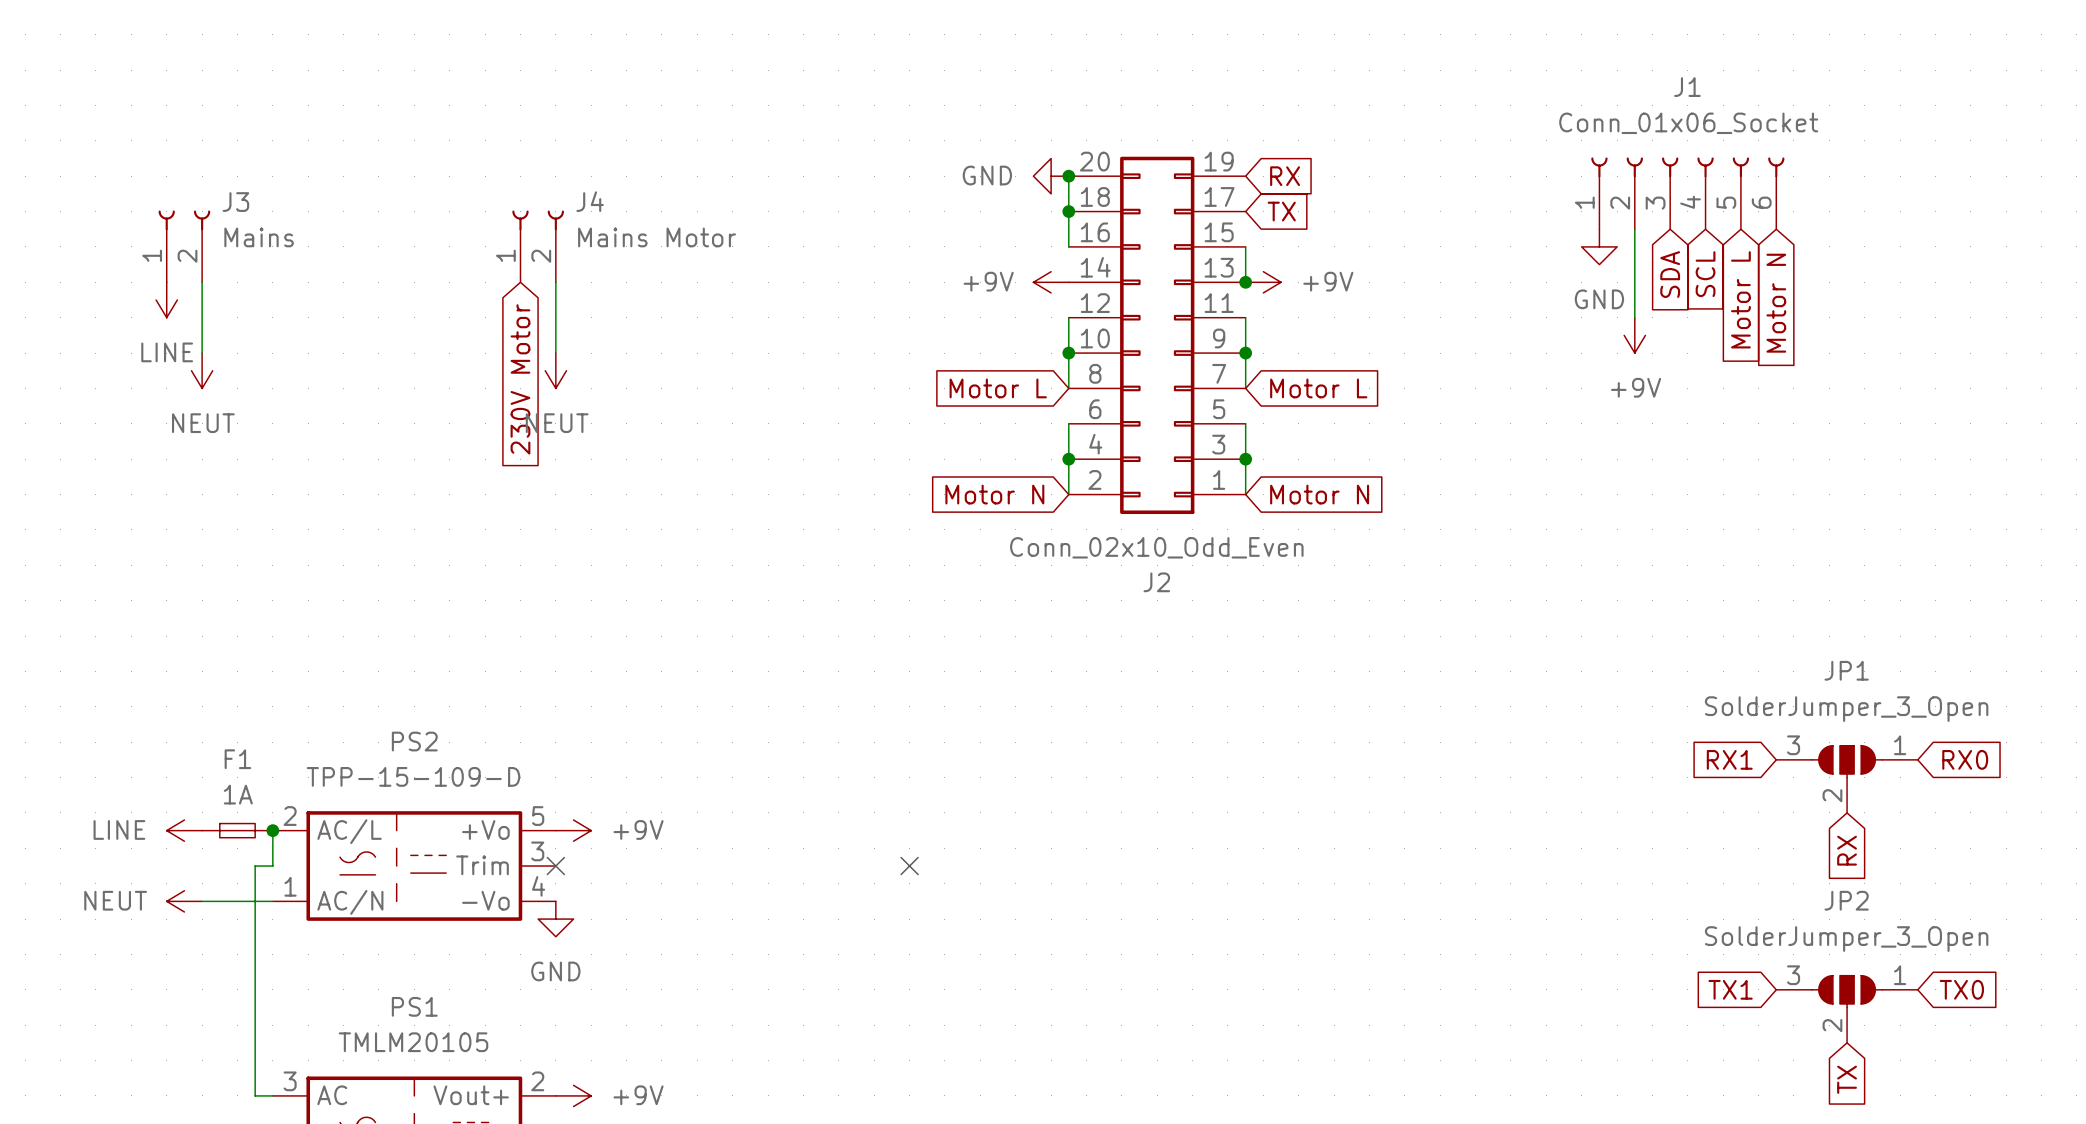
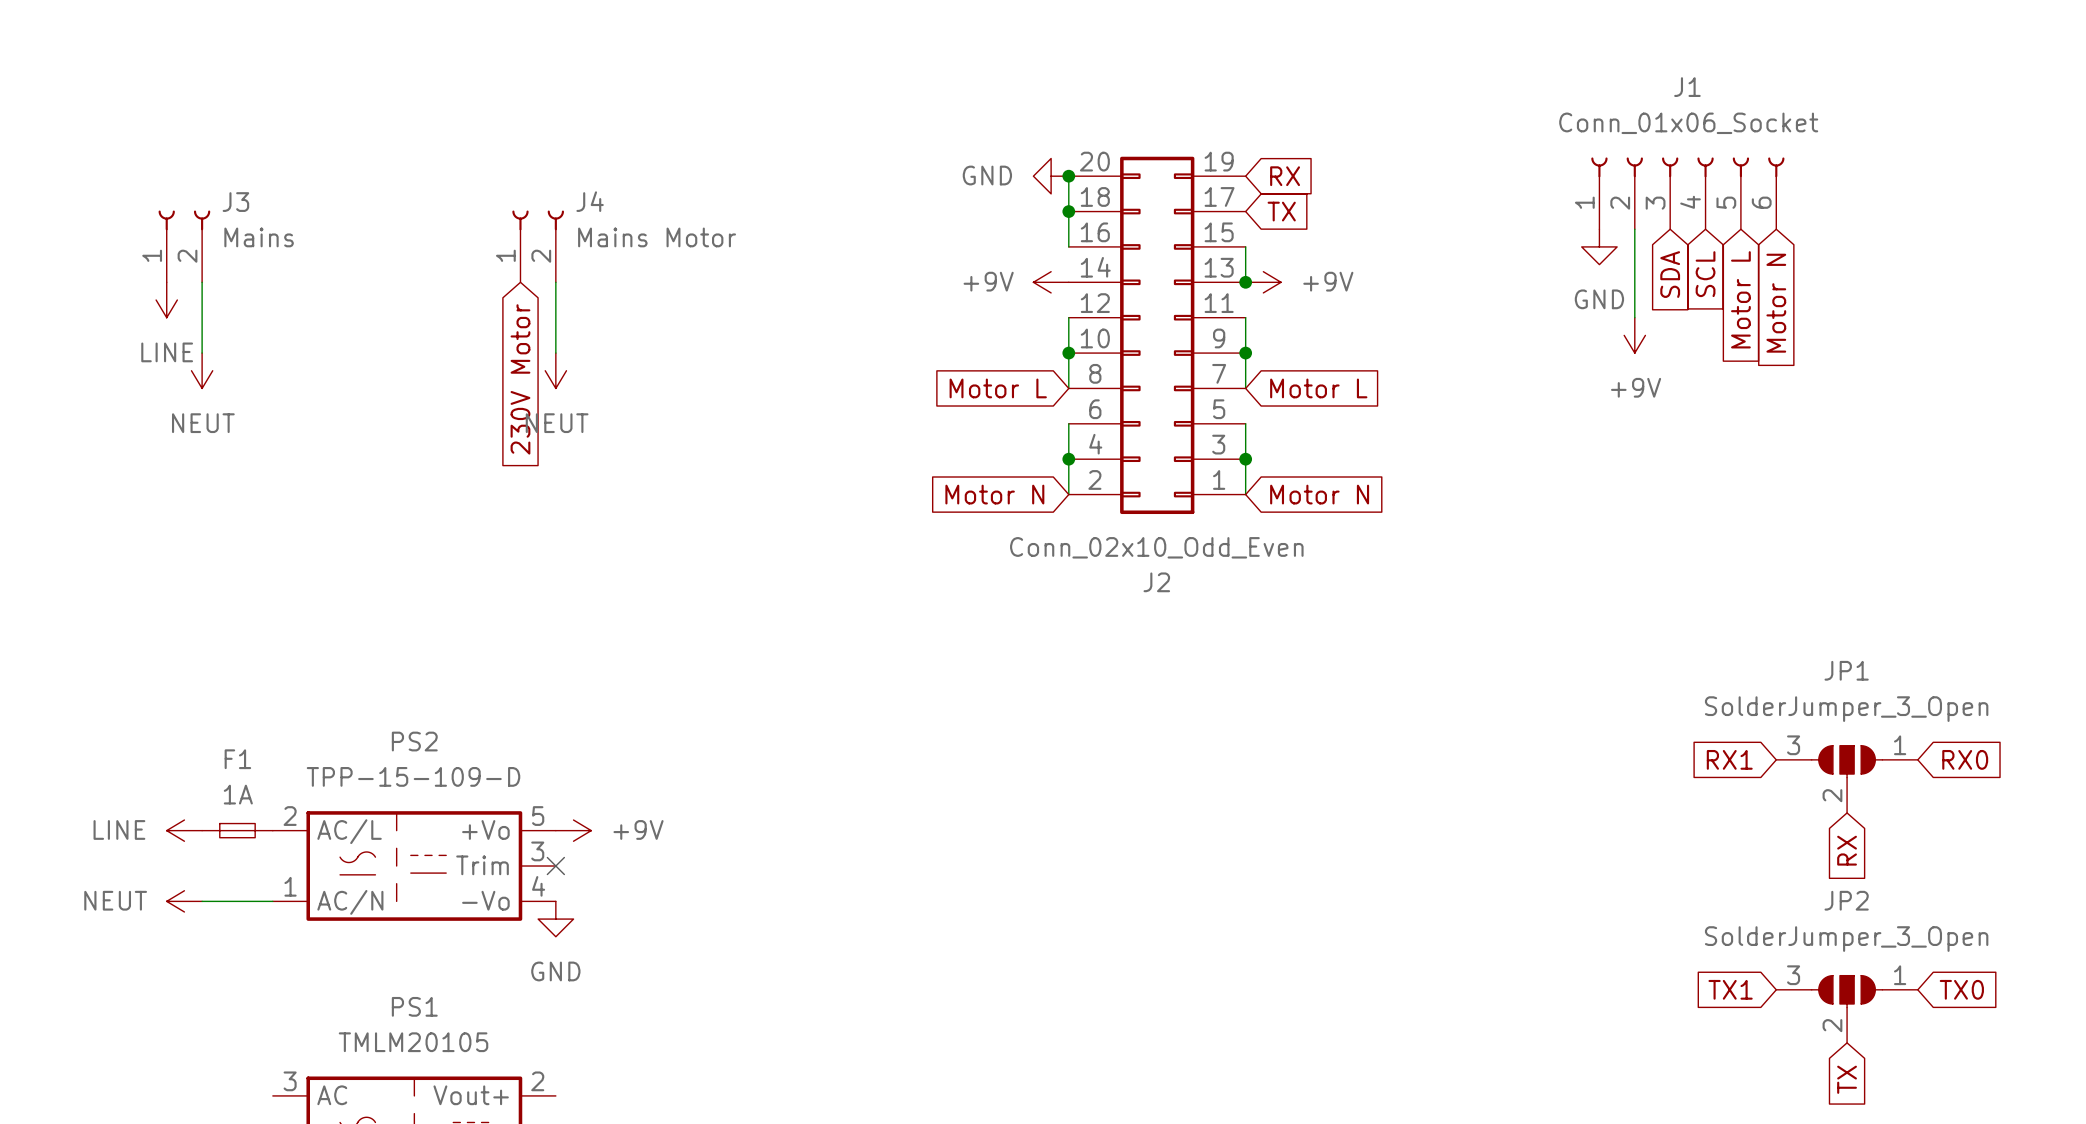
wire: (272, 830) (272, 866) (255, 866) (255, 1095) (272, 1095) -> none
junction: (272, 830) -> none
no-connect mark: (909, 866) -> none
power symbol: +9V (573, 1095) -> none

